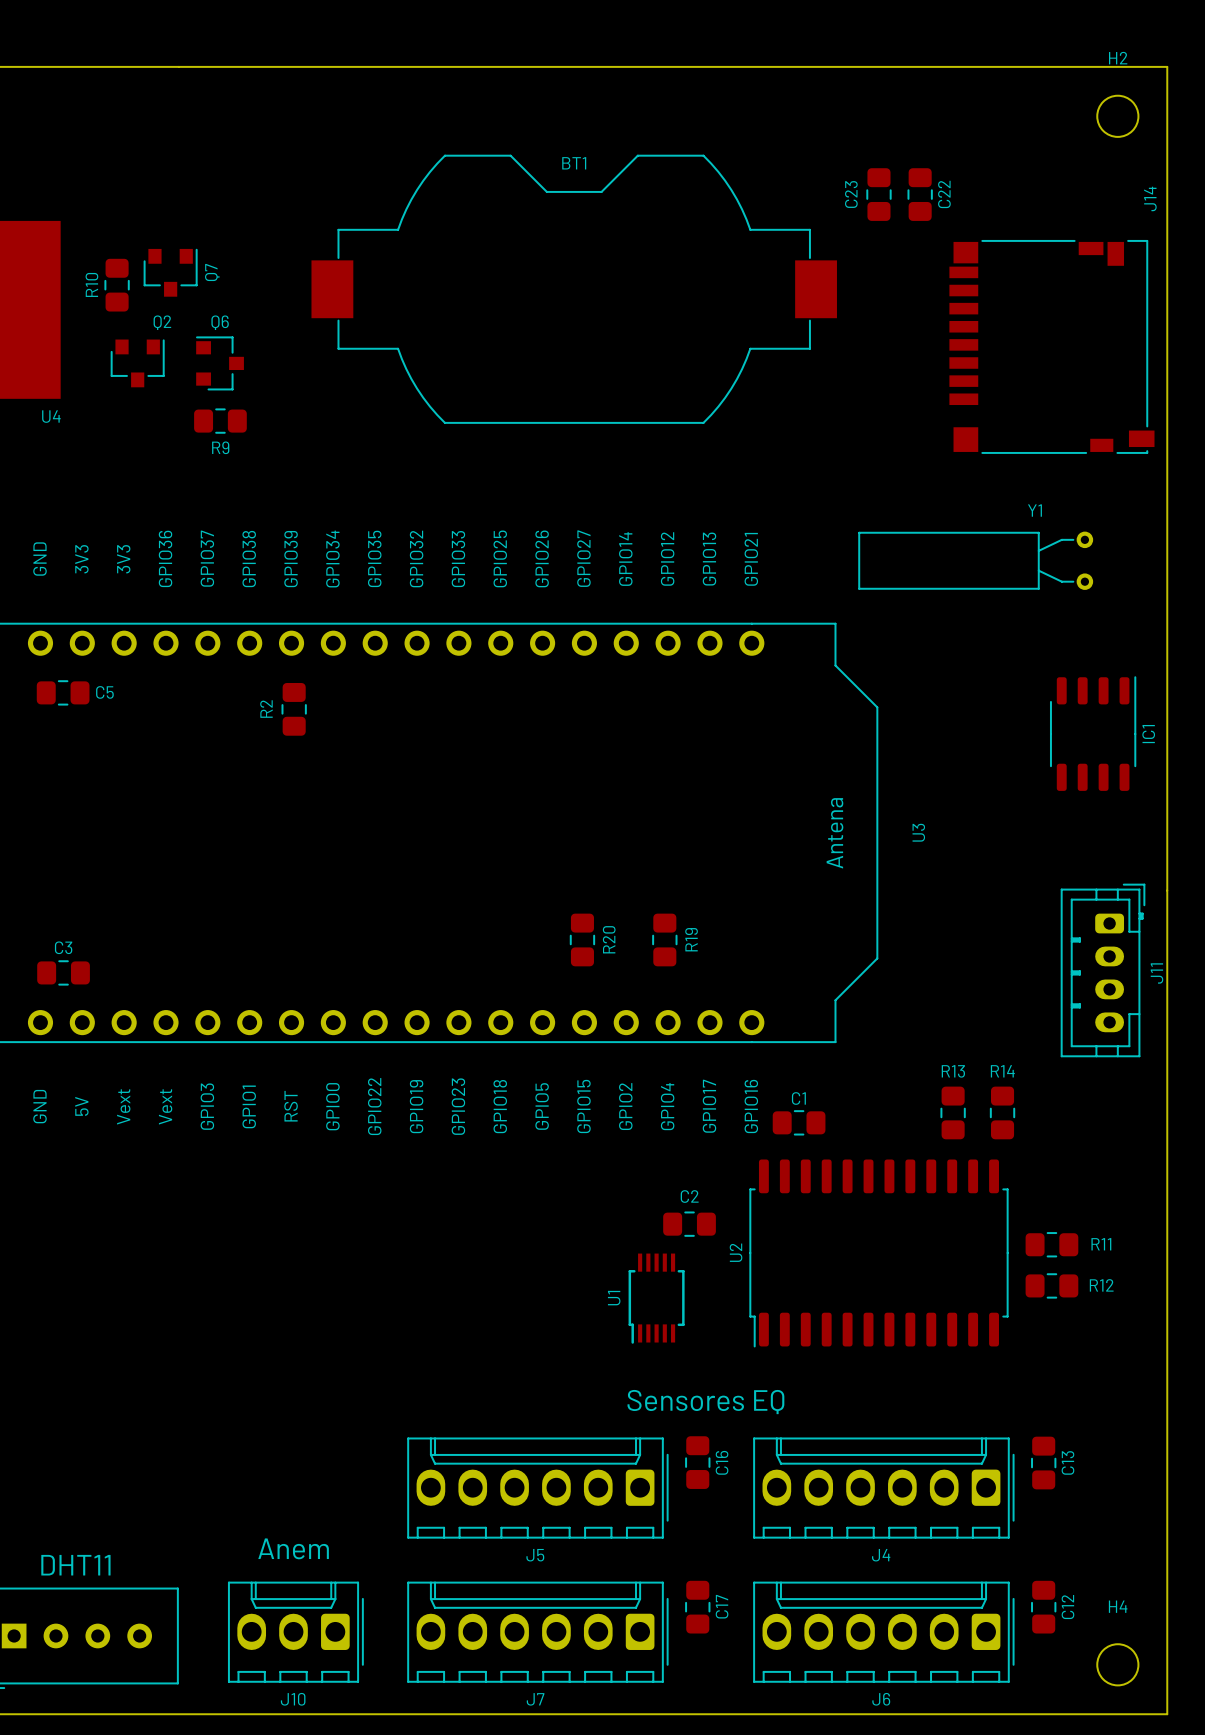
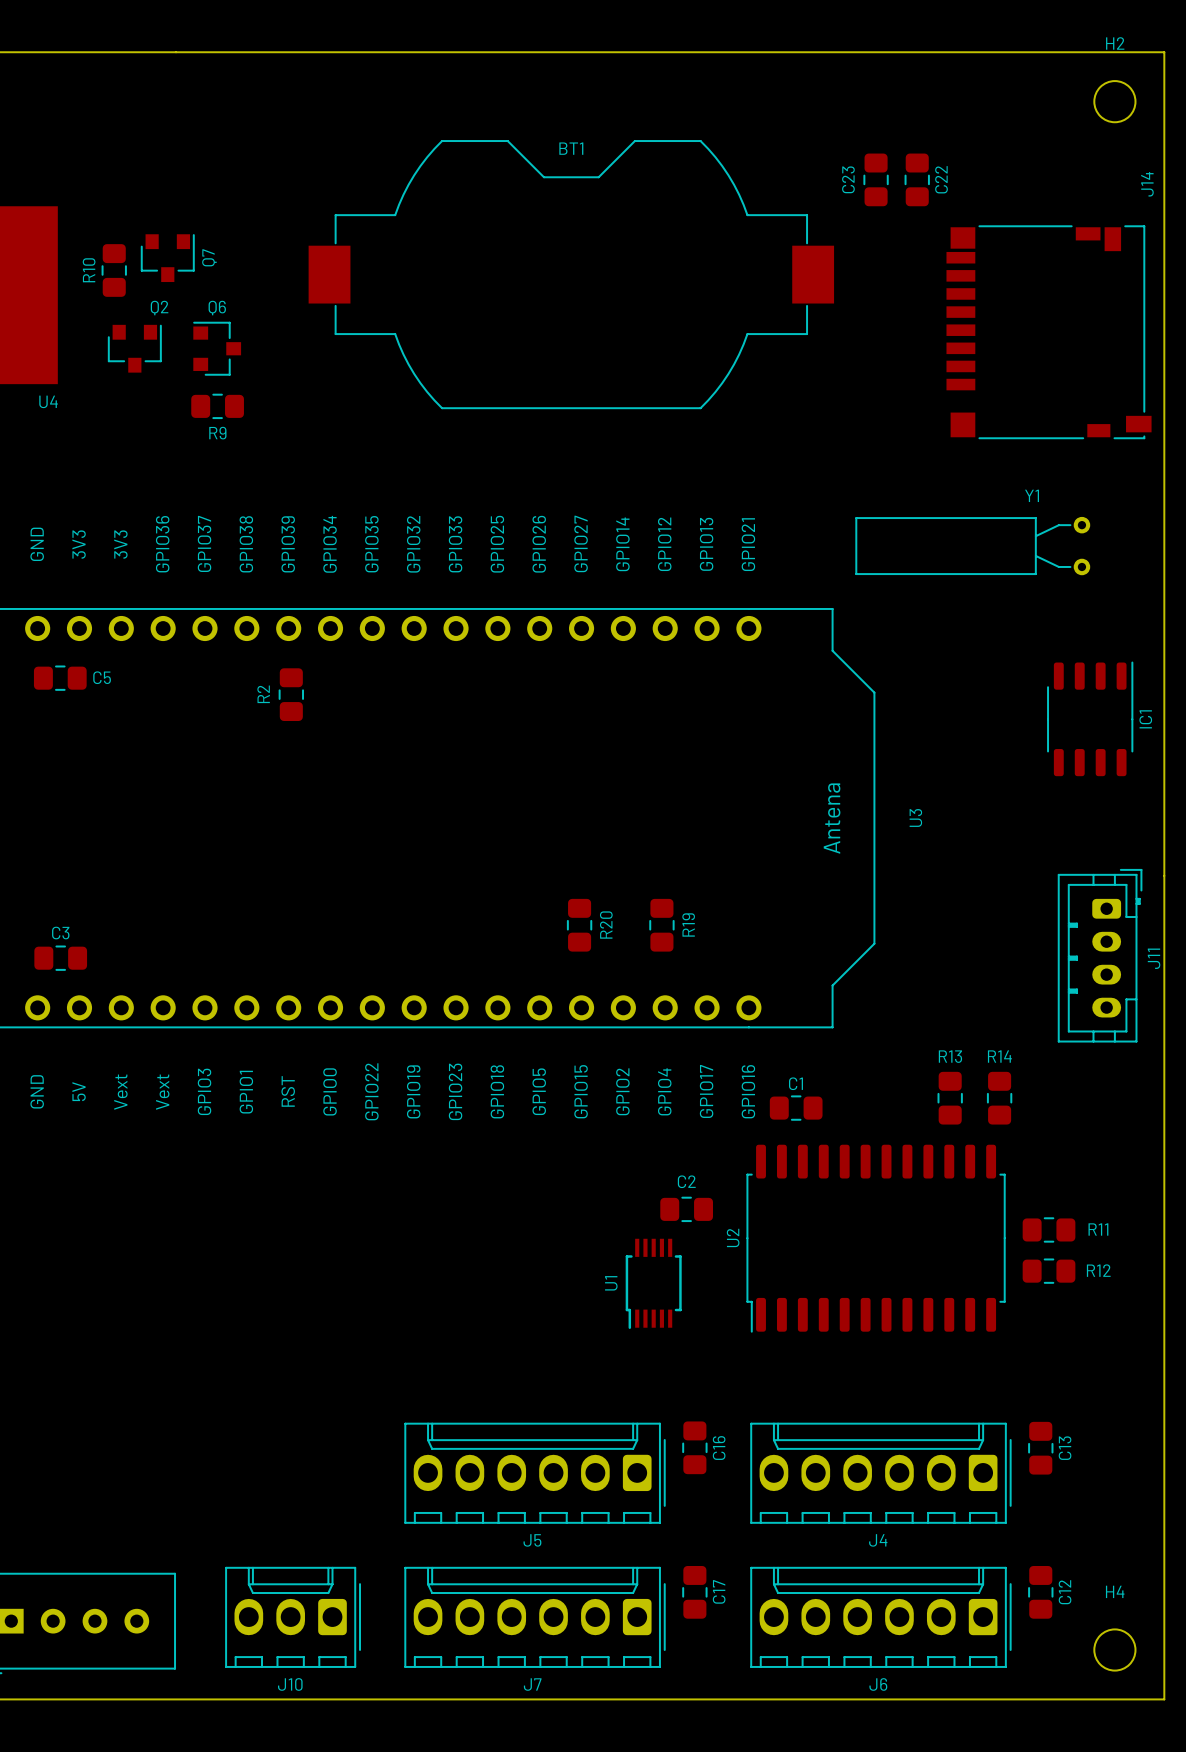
text: Sensores EQ (705, 1402) -> none
text: Anem (293, 1548) -> none
text: DHT11 (75, 1565) -> none

